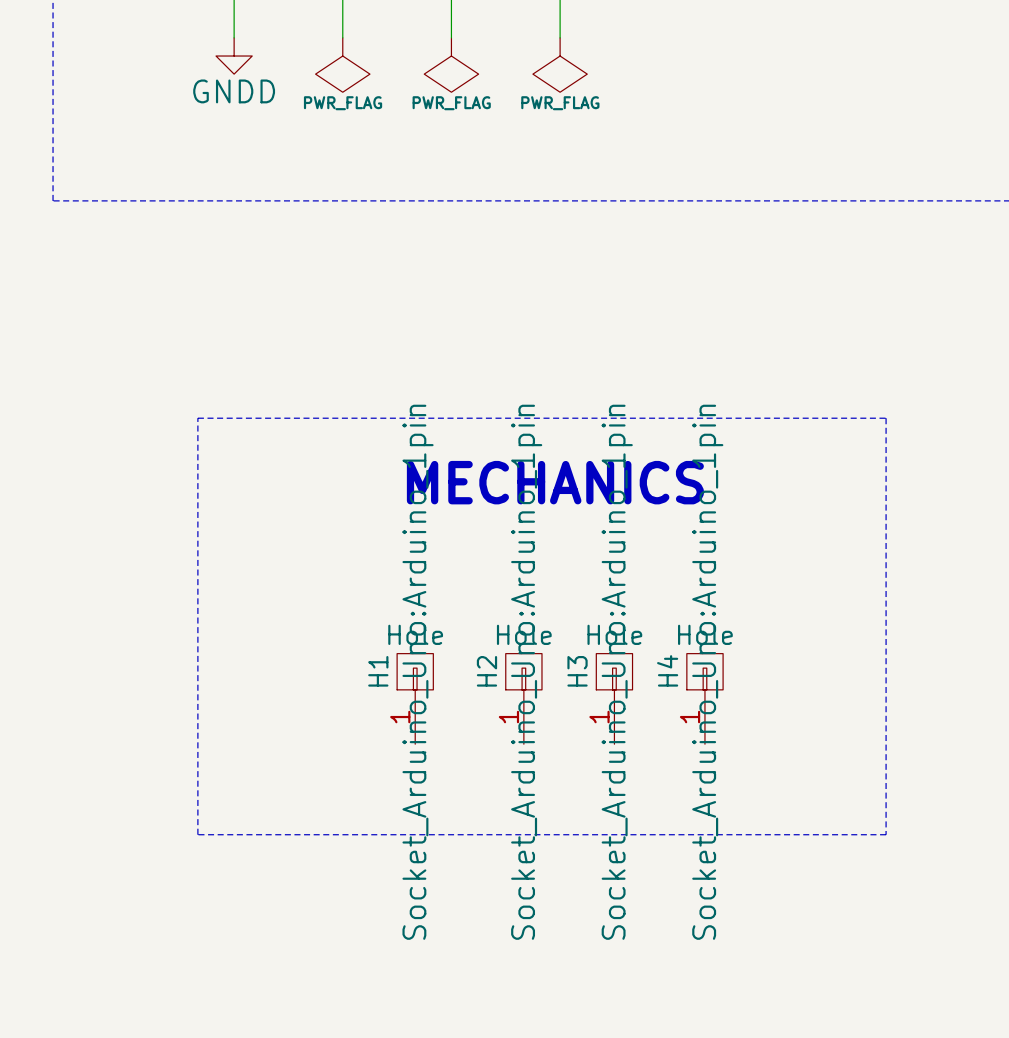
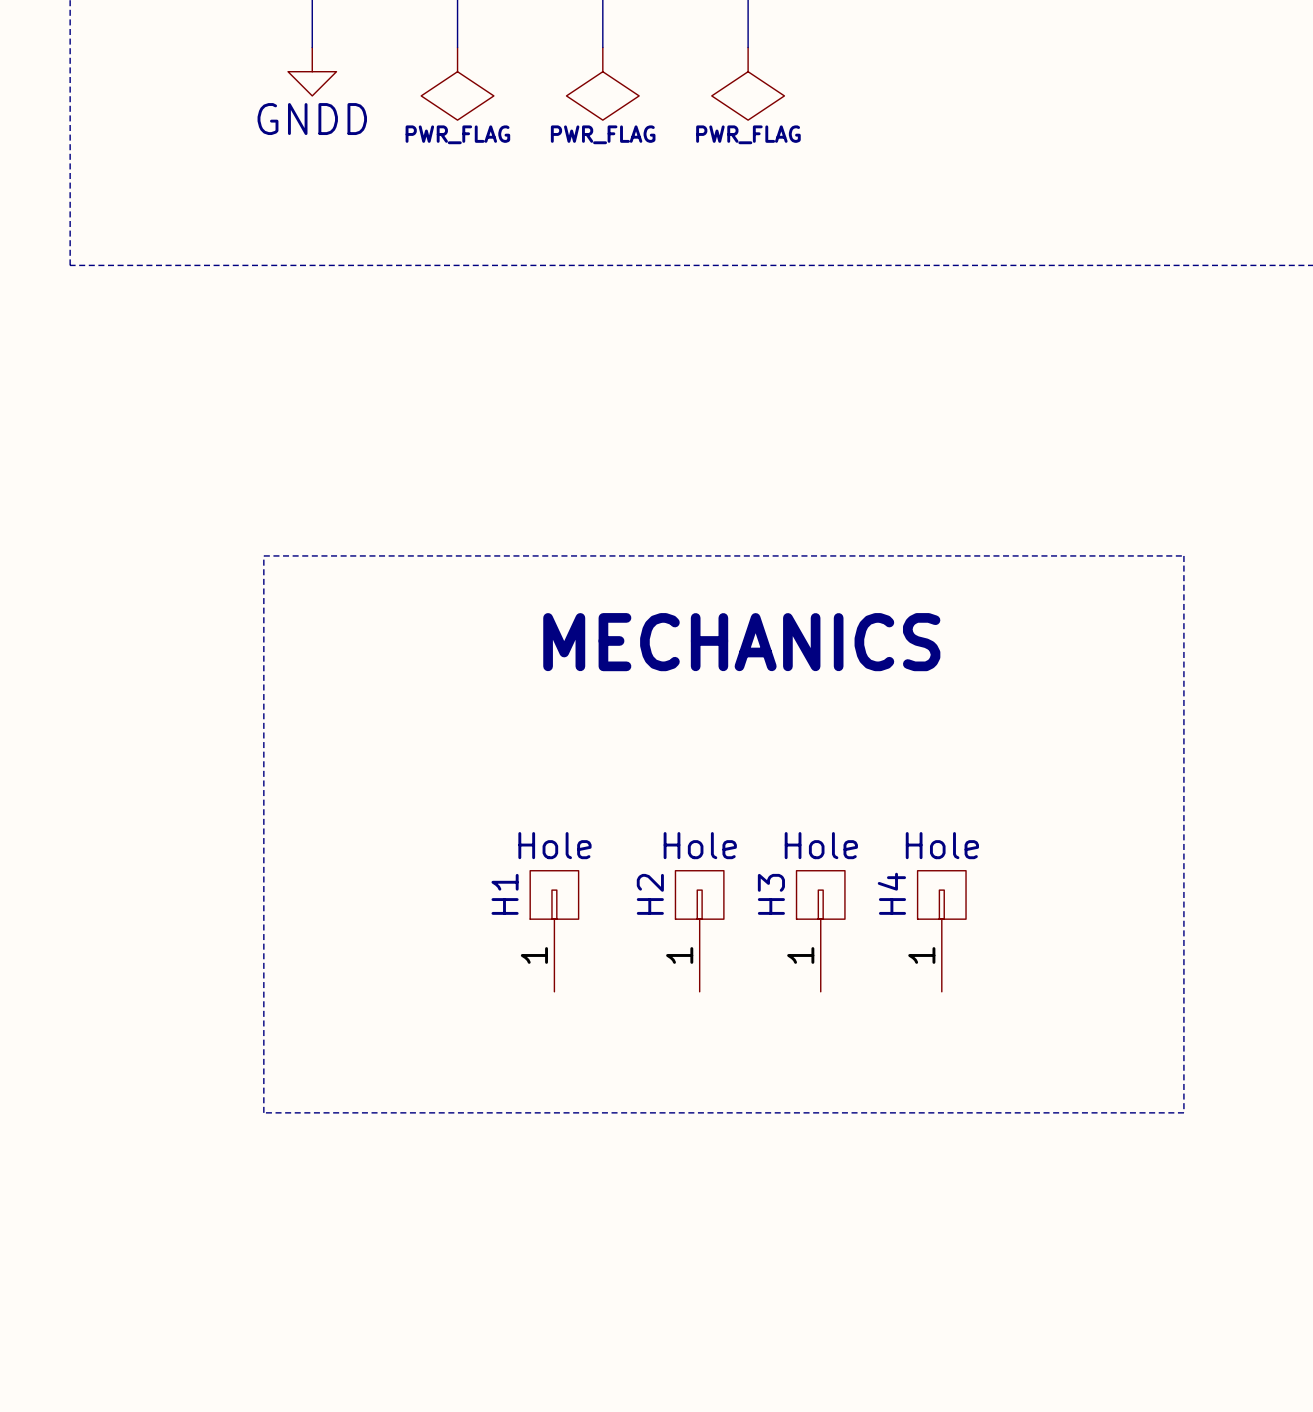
H1 text: Socket_Arduino_Uno:Arduino_1pin (418, 672) -> none
H2 text: Socket_Arduino_Uno:Arduino_1pin (526, 672) -> none
H3 text: Socket_Arduino_Uno:Arduino_1pin (617, 672) -> none
H4 text: Socket_Arduino_Uno:Arduino_1pin (707, 672) -> none

